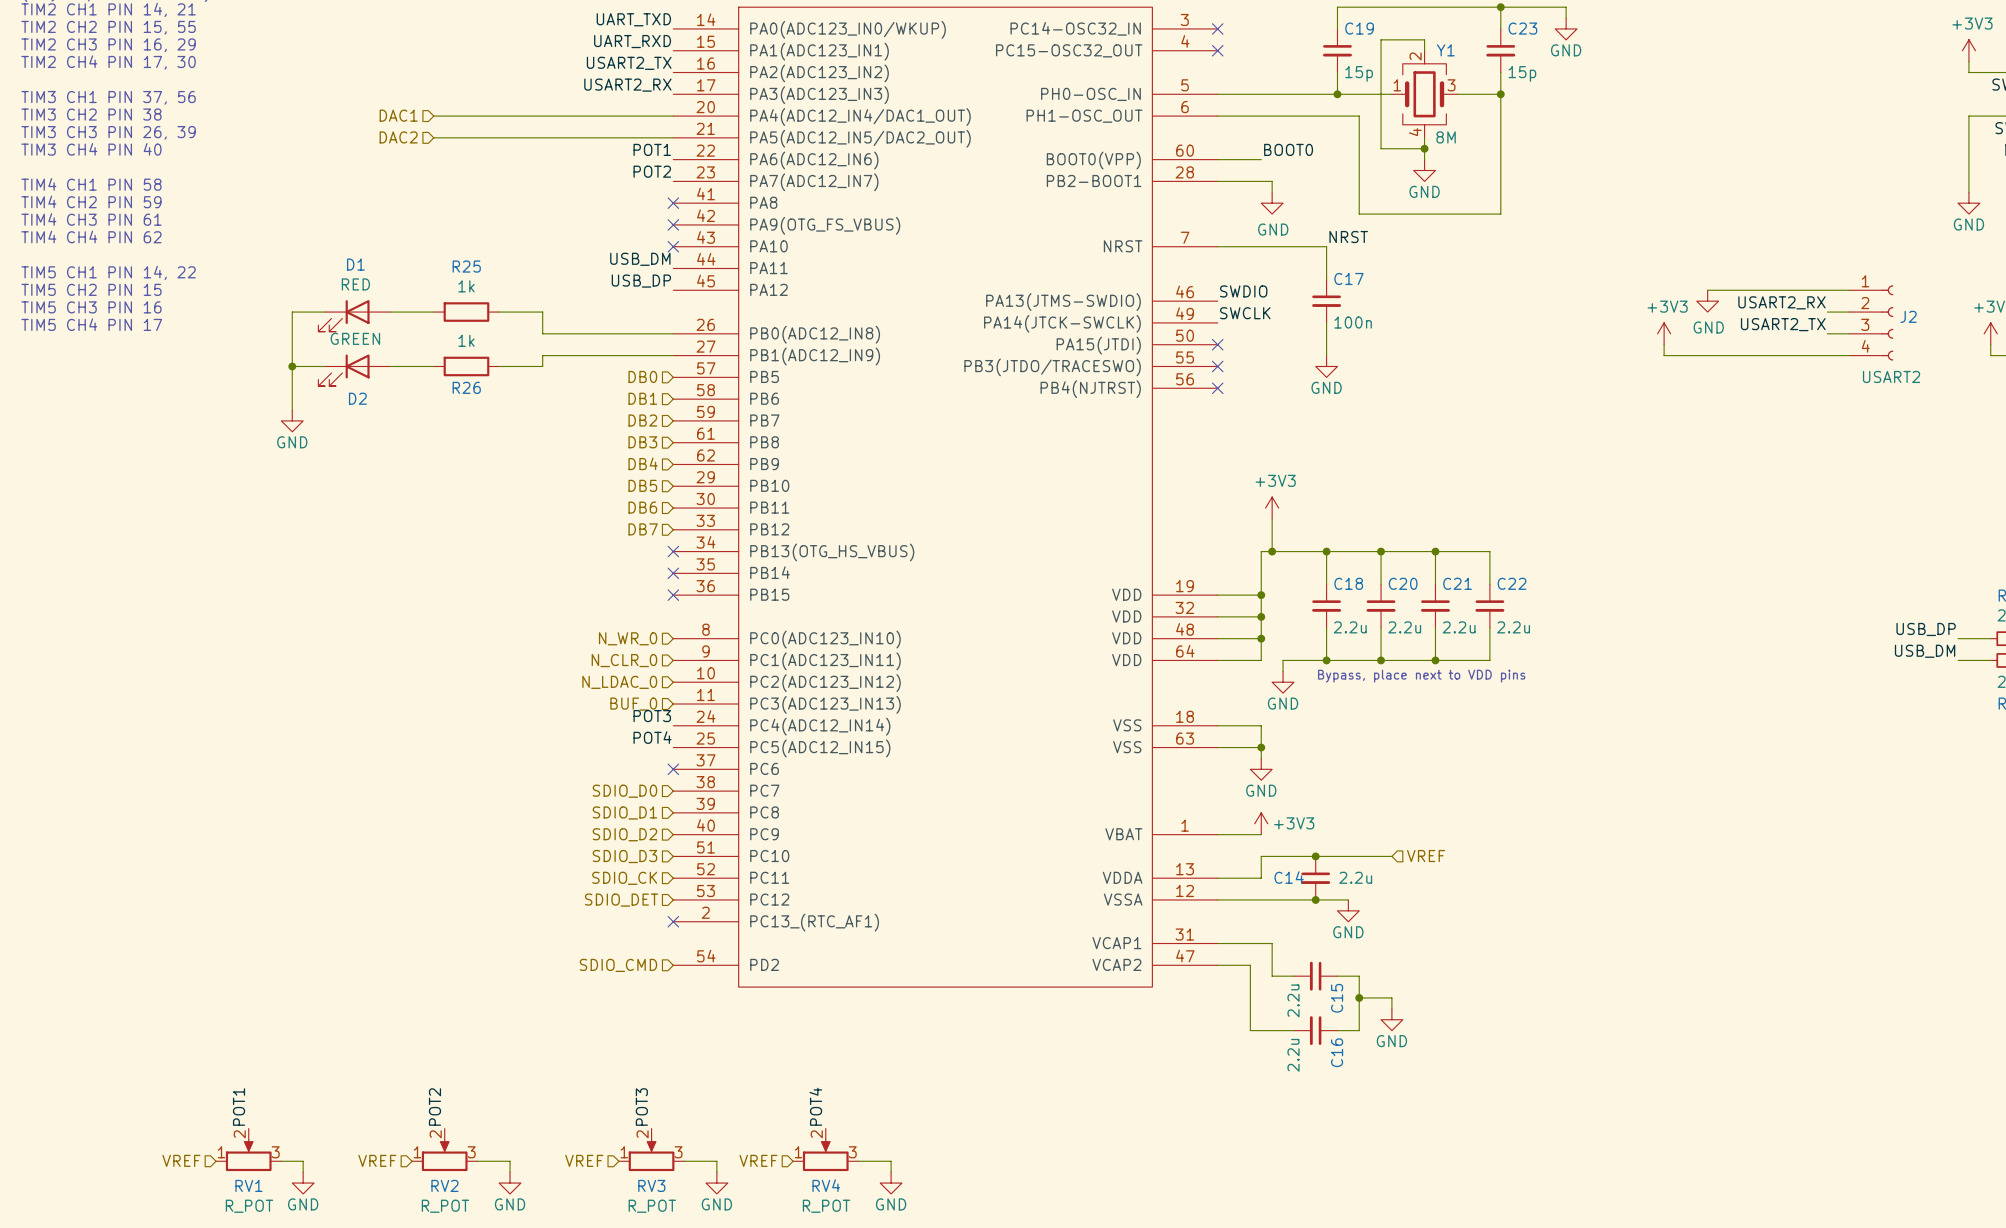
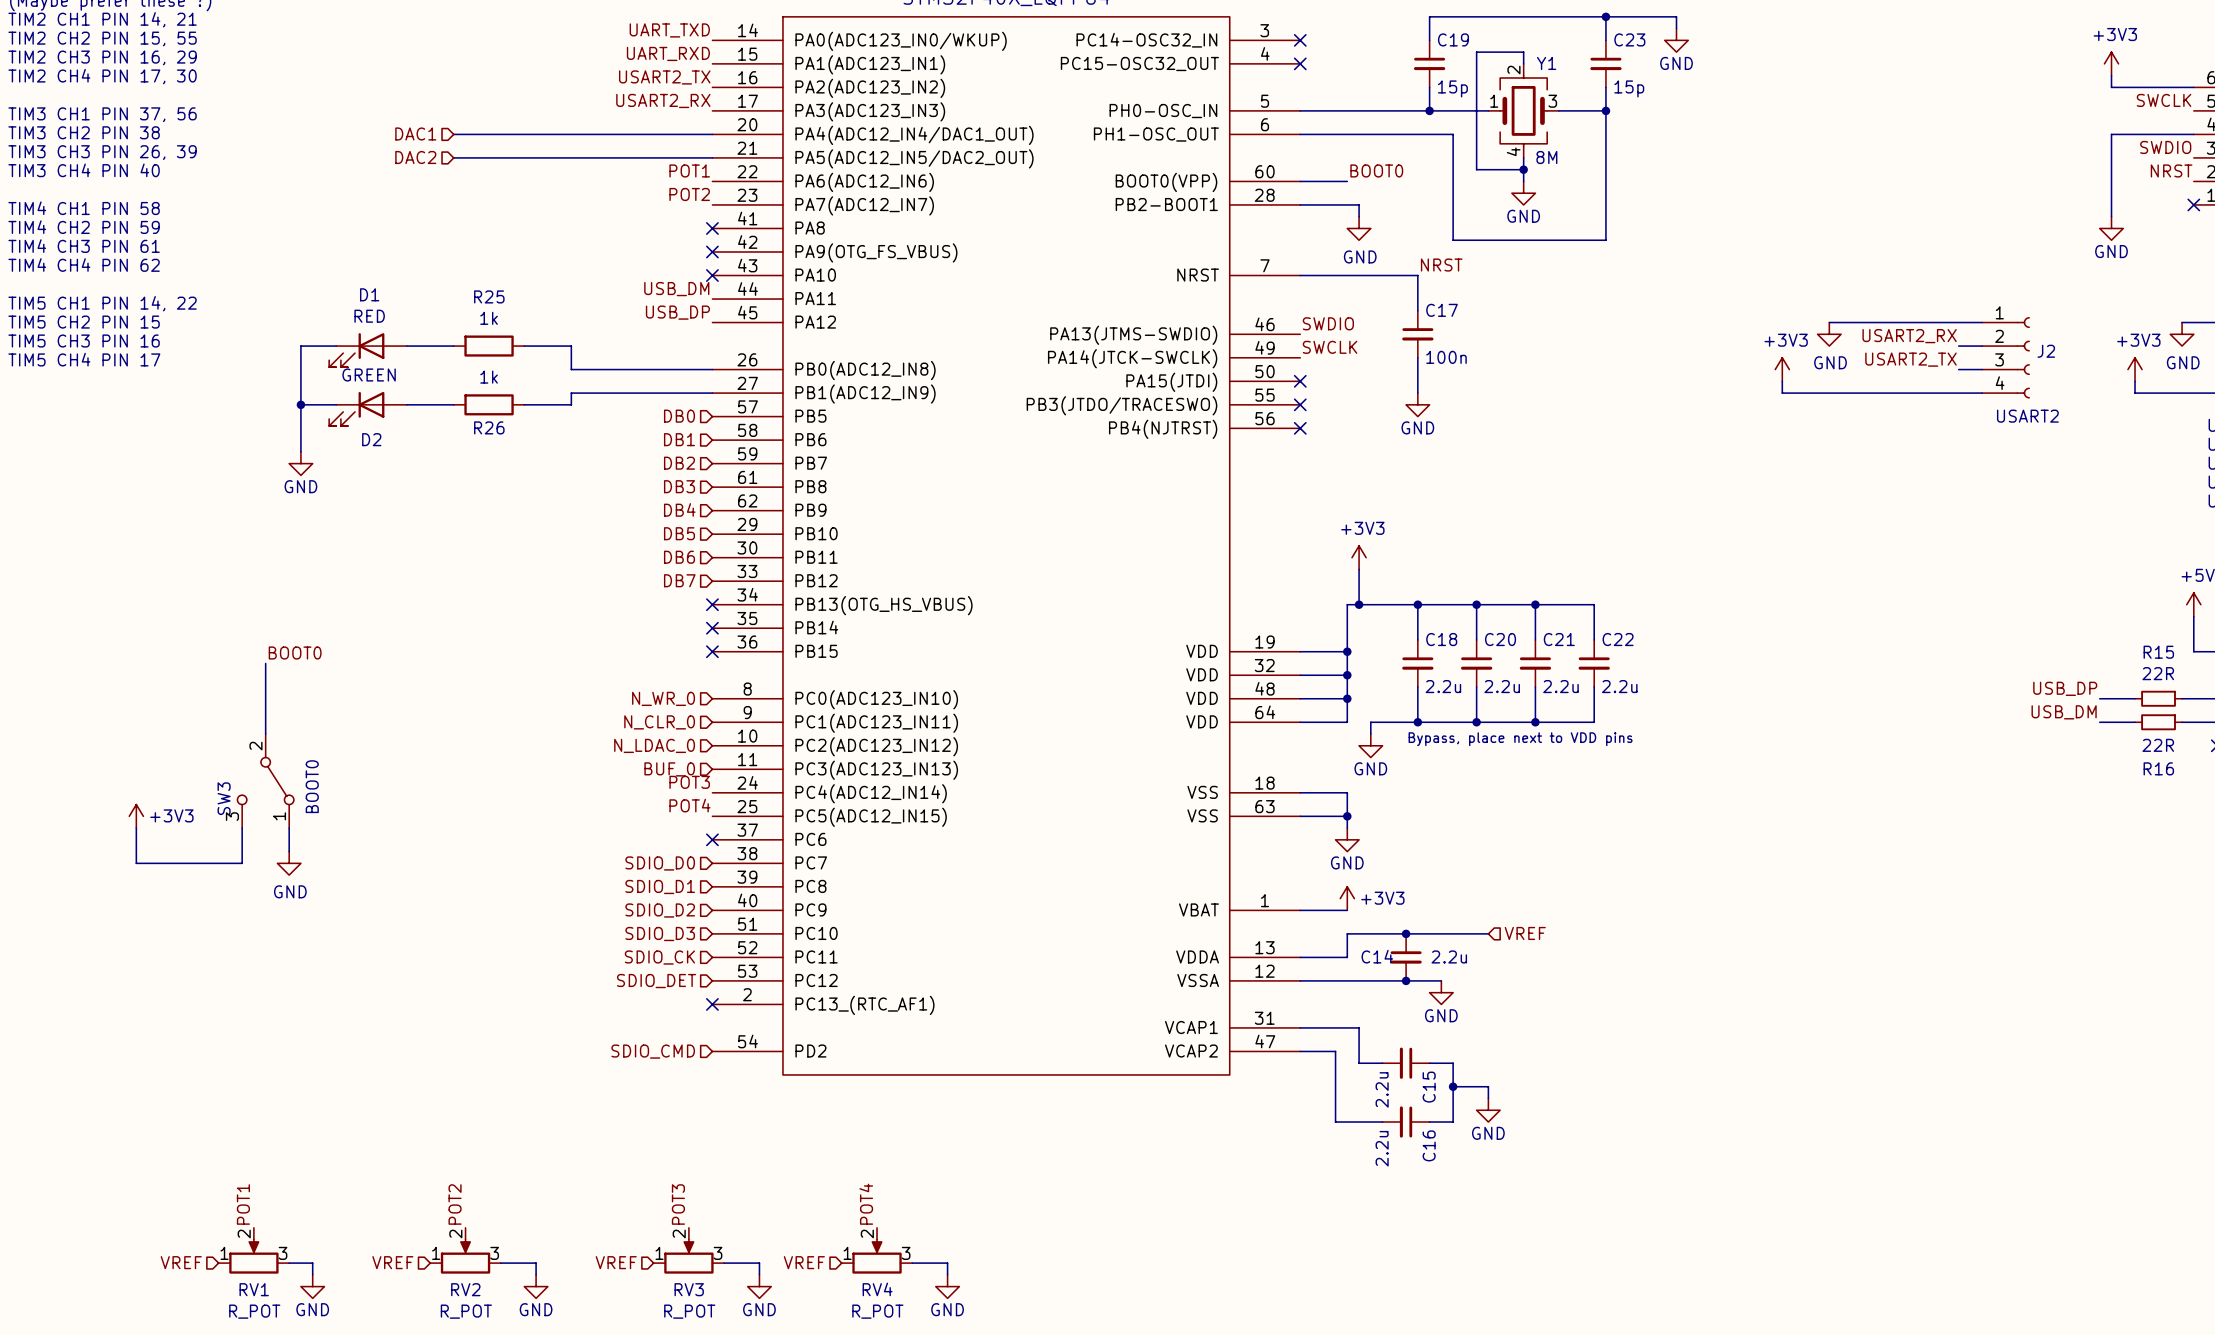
label: none -> BOOT0 (295, 652)
wire: none -> (265, 663) (265, 734)
SW3: none -> BOOT0 (265, 781)
power symbol: none -> +3V3 (136, 816)
wire: none -> (136, 828) (136, 863) (242, 863) (242, 828)
wire: none -> (289, 828) (289, 851)
power symbol: none -> GND (289, 863)

